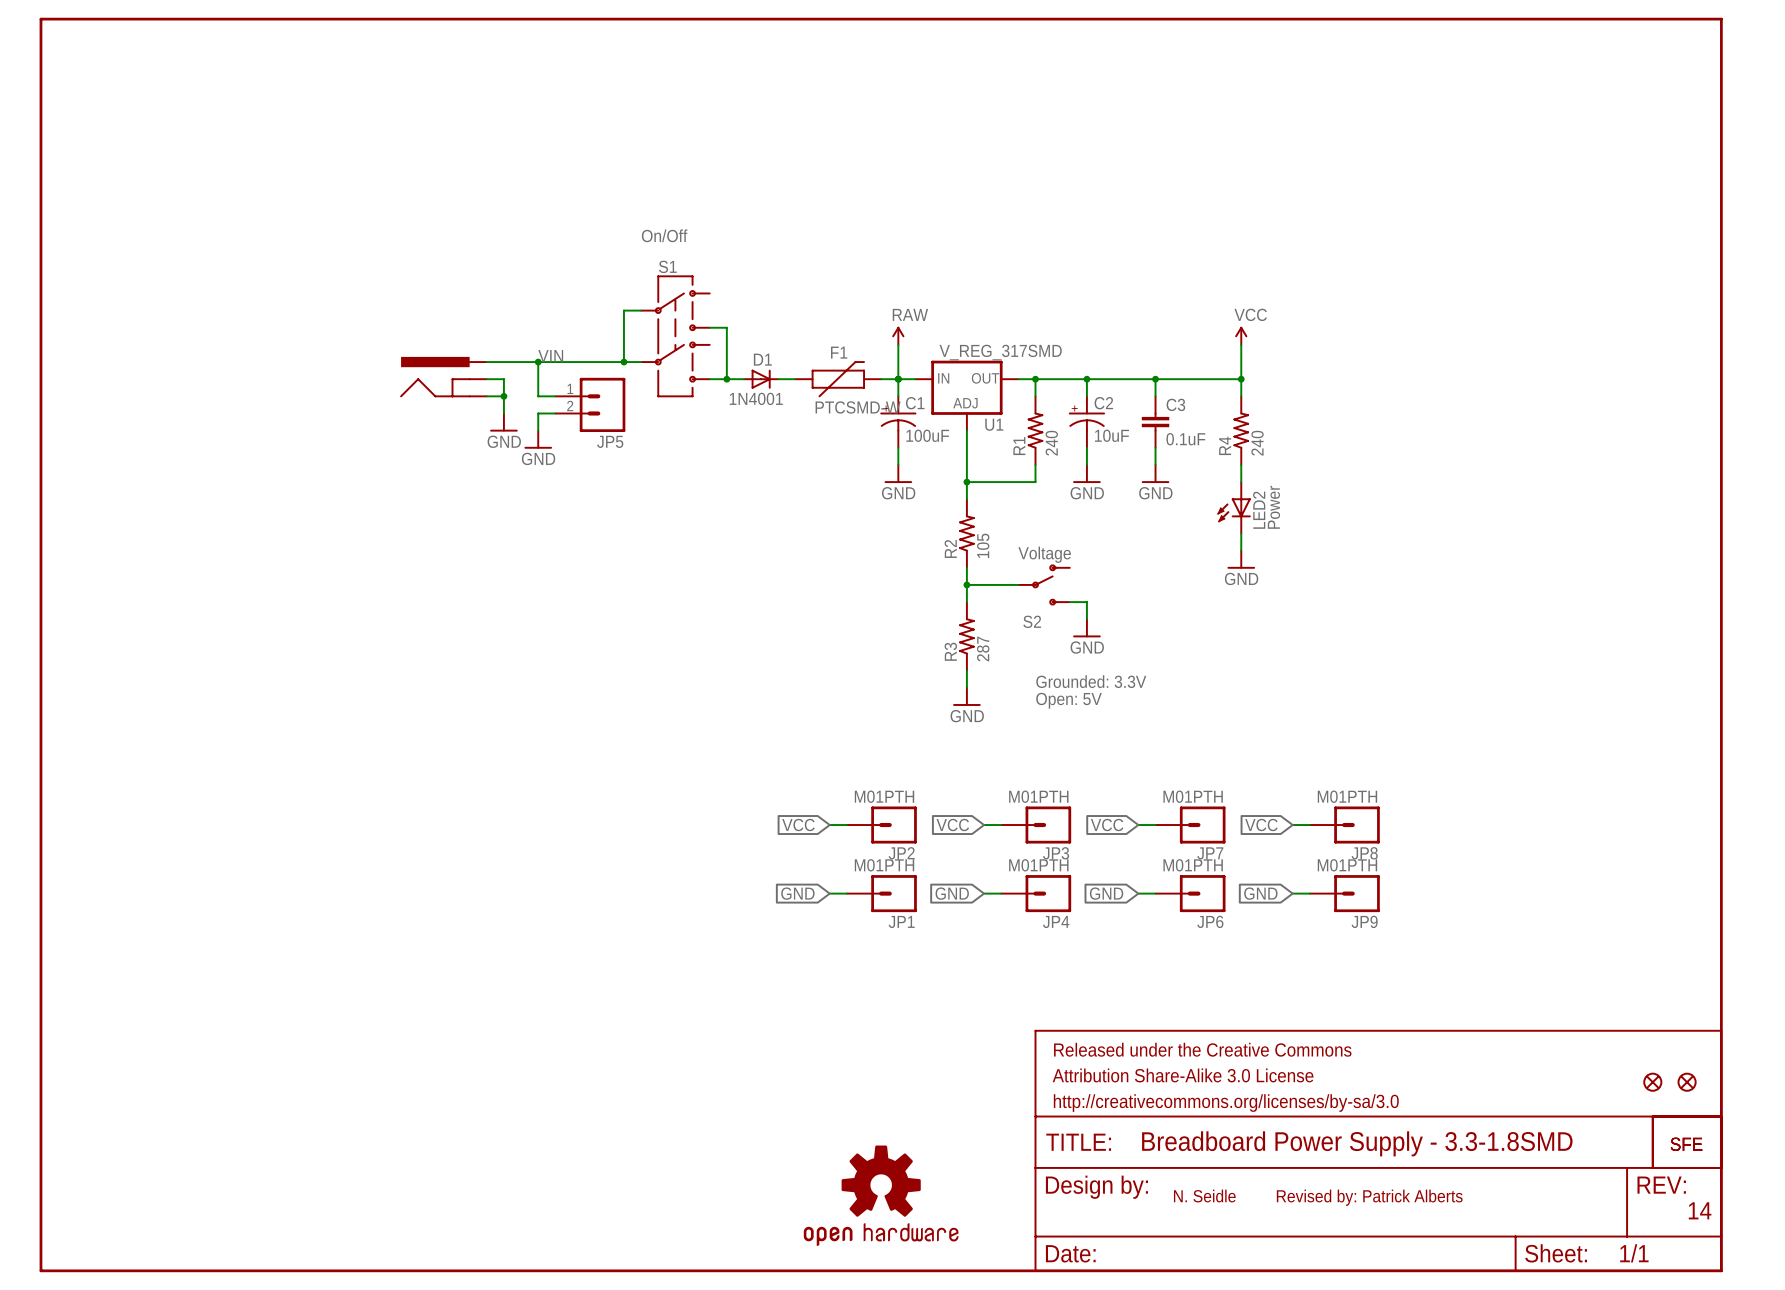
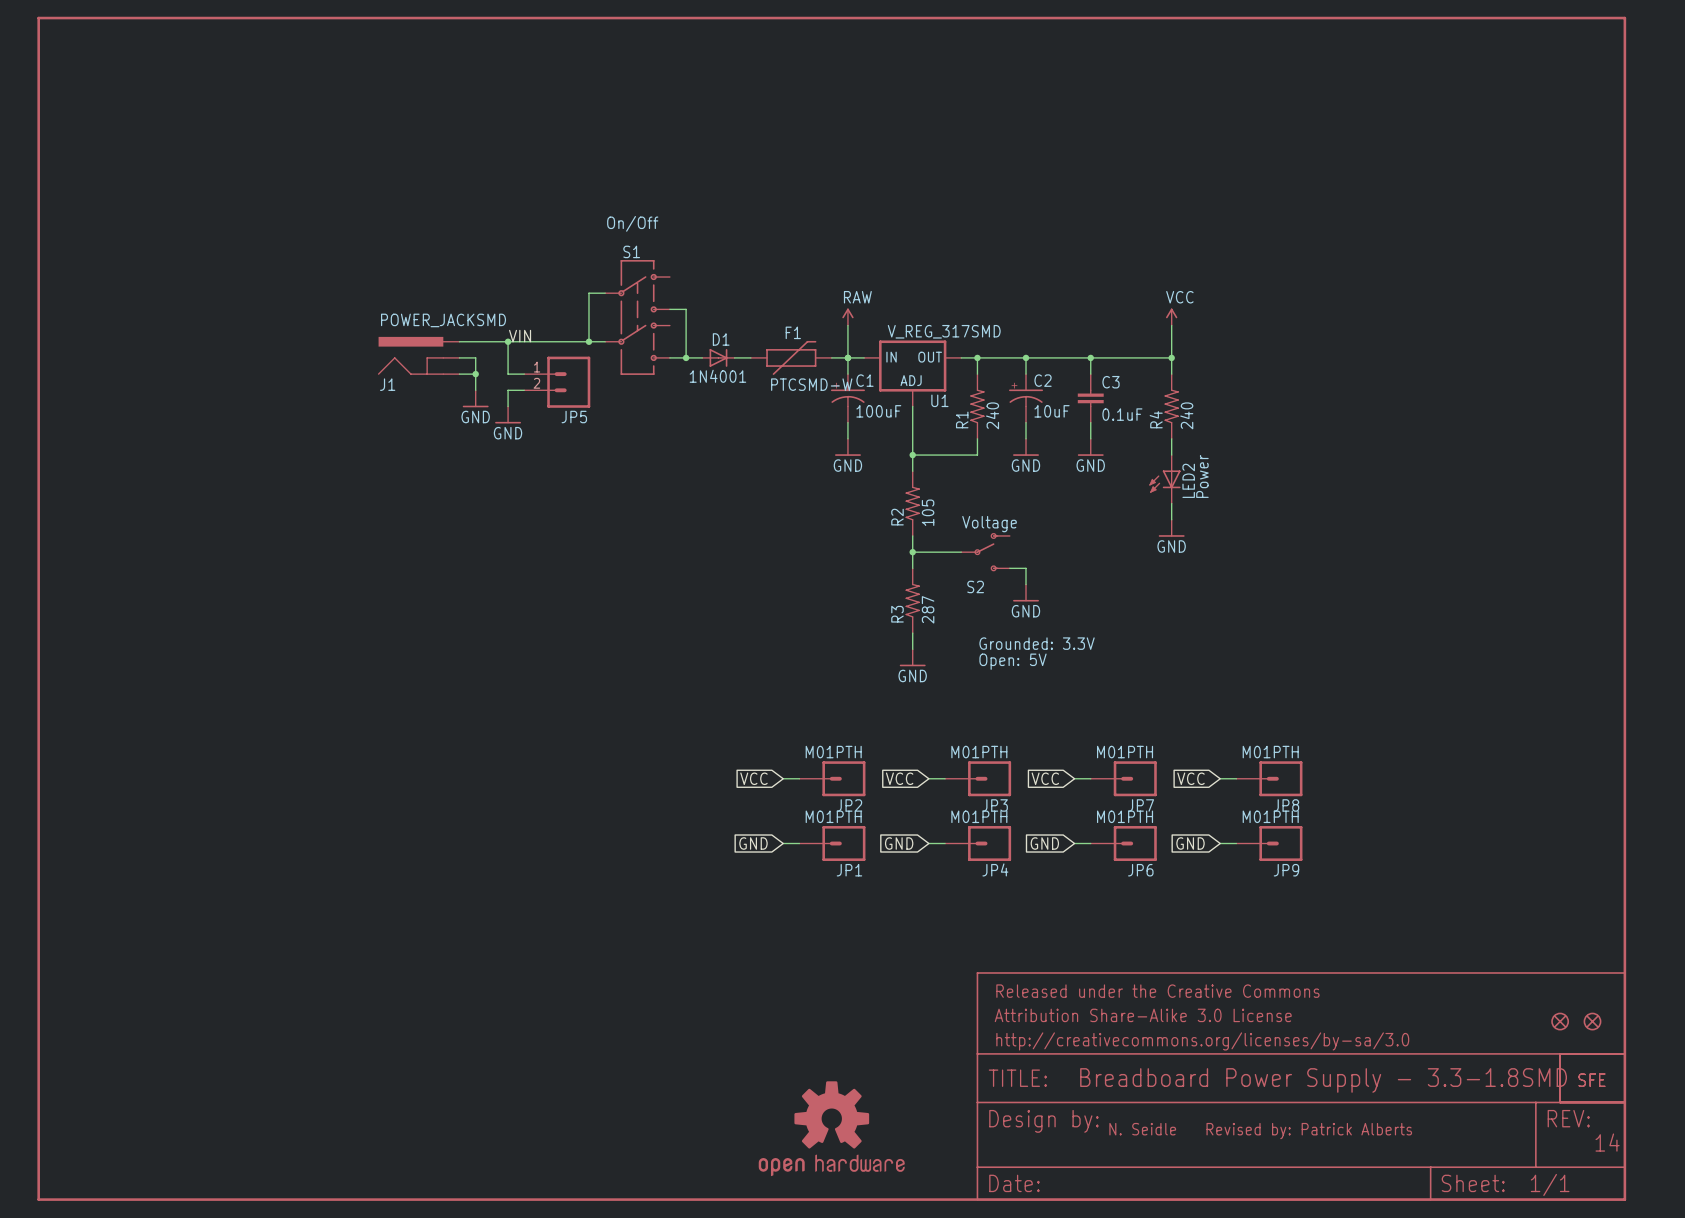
J1 value: none -> POWER_JACKSMD (443, 320)
J1 name: none -> J1 (387, 384)

